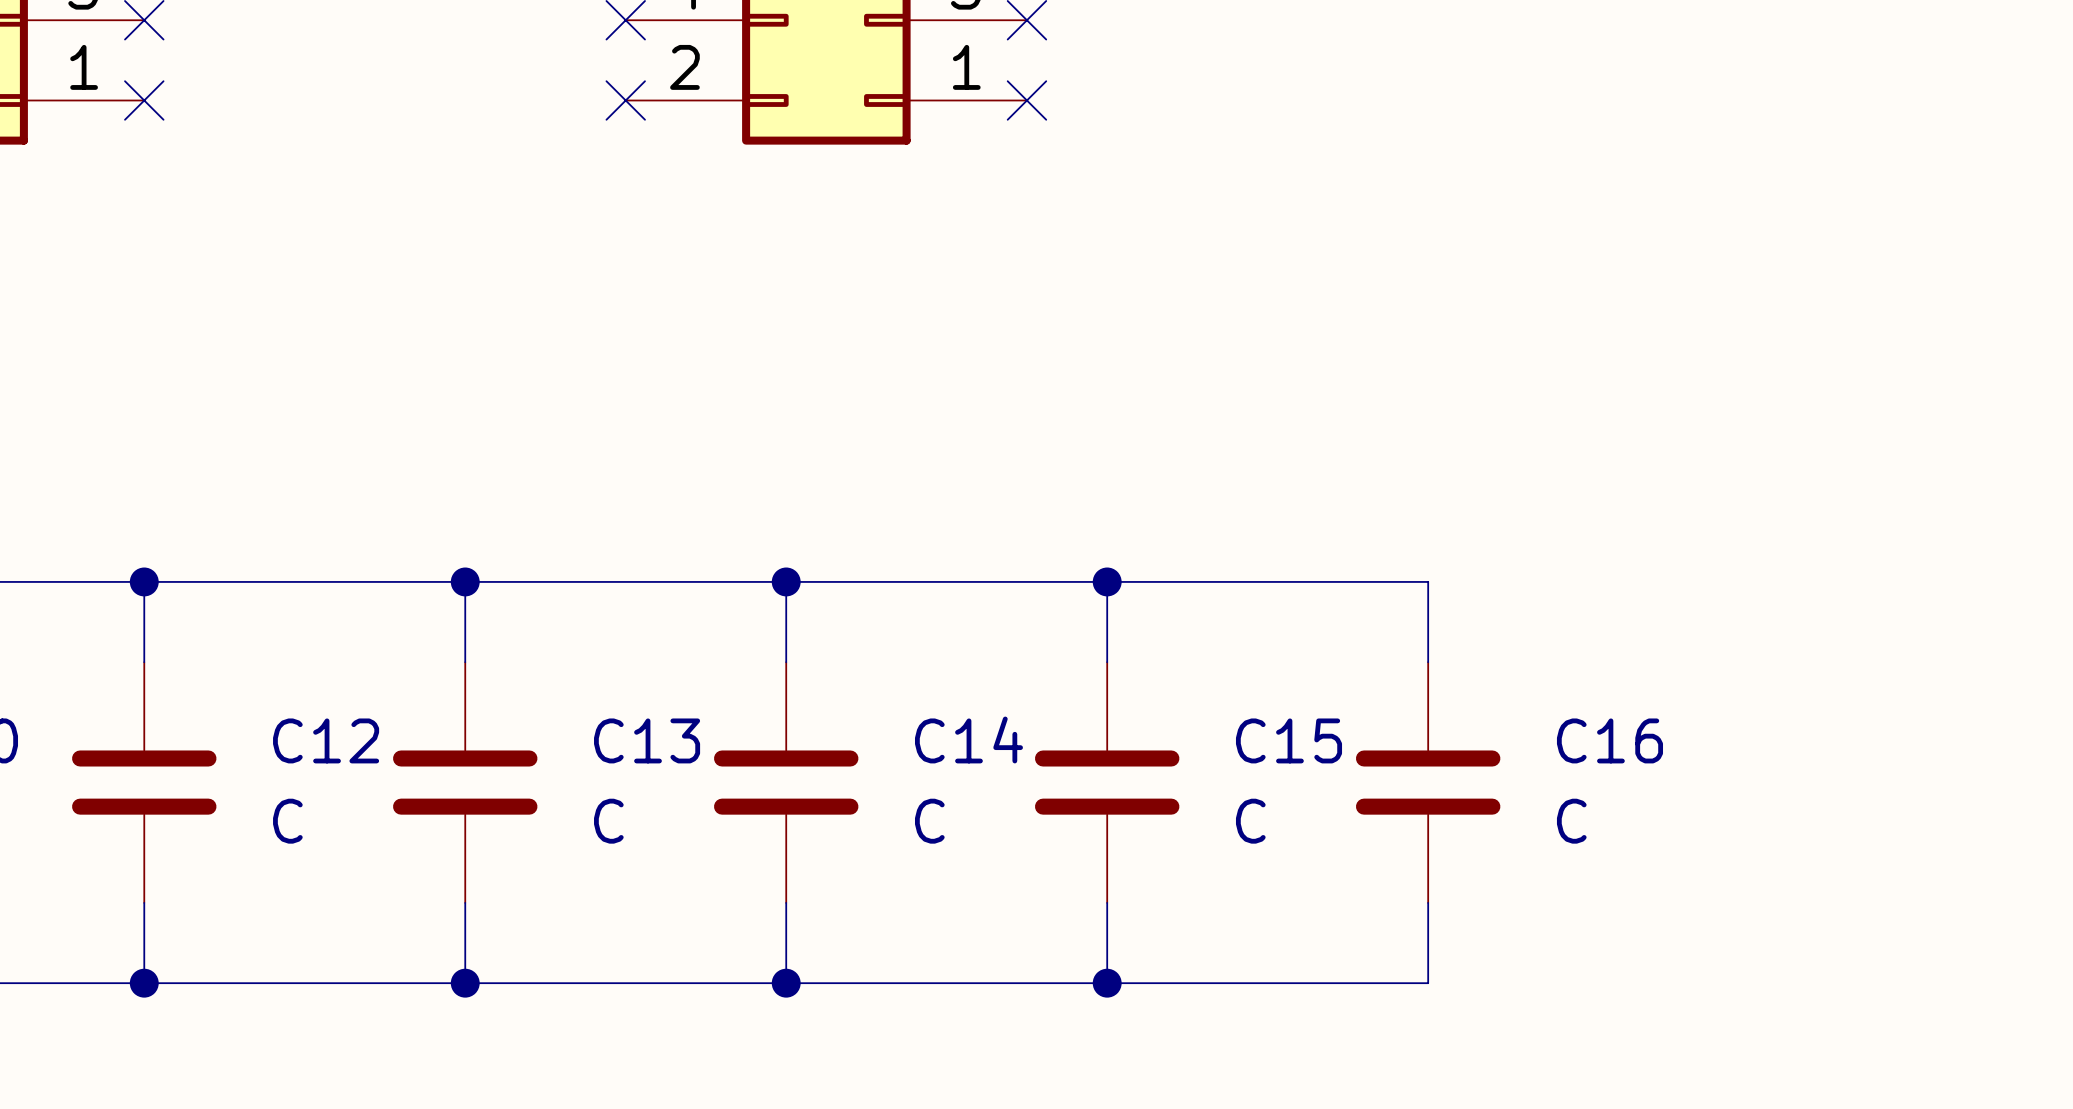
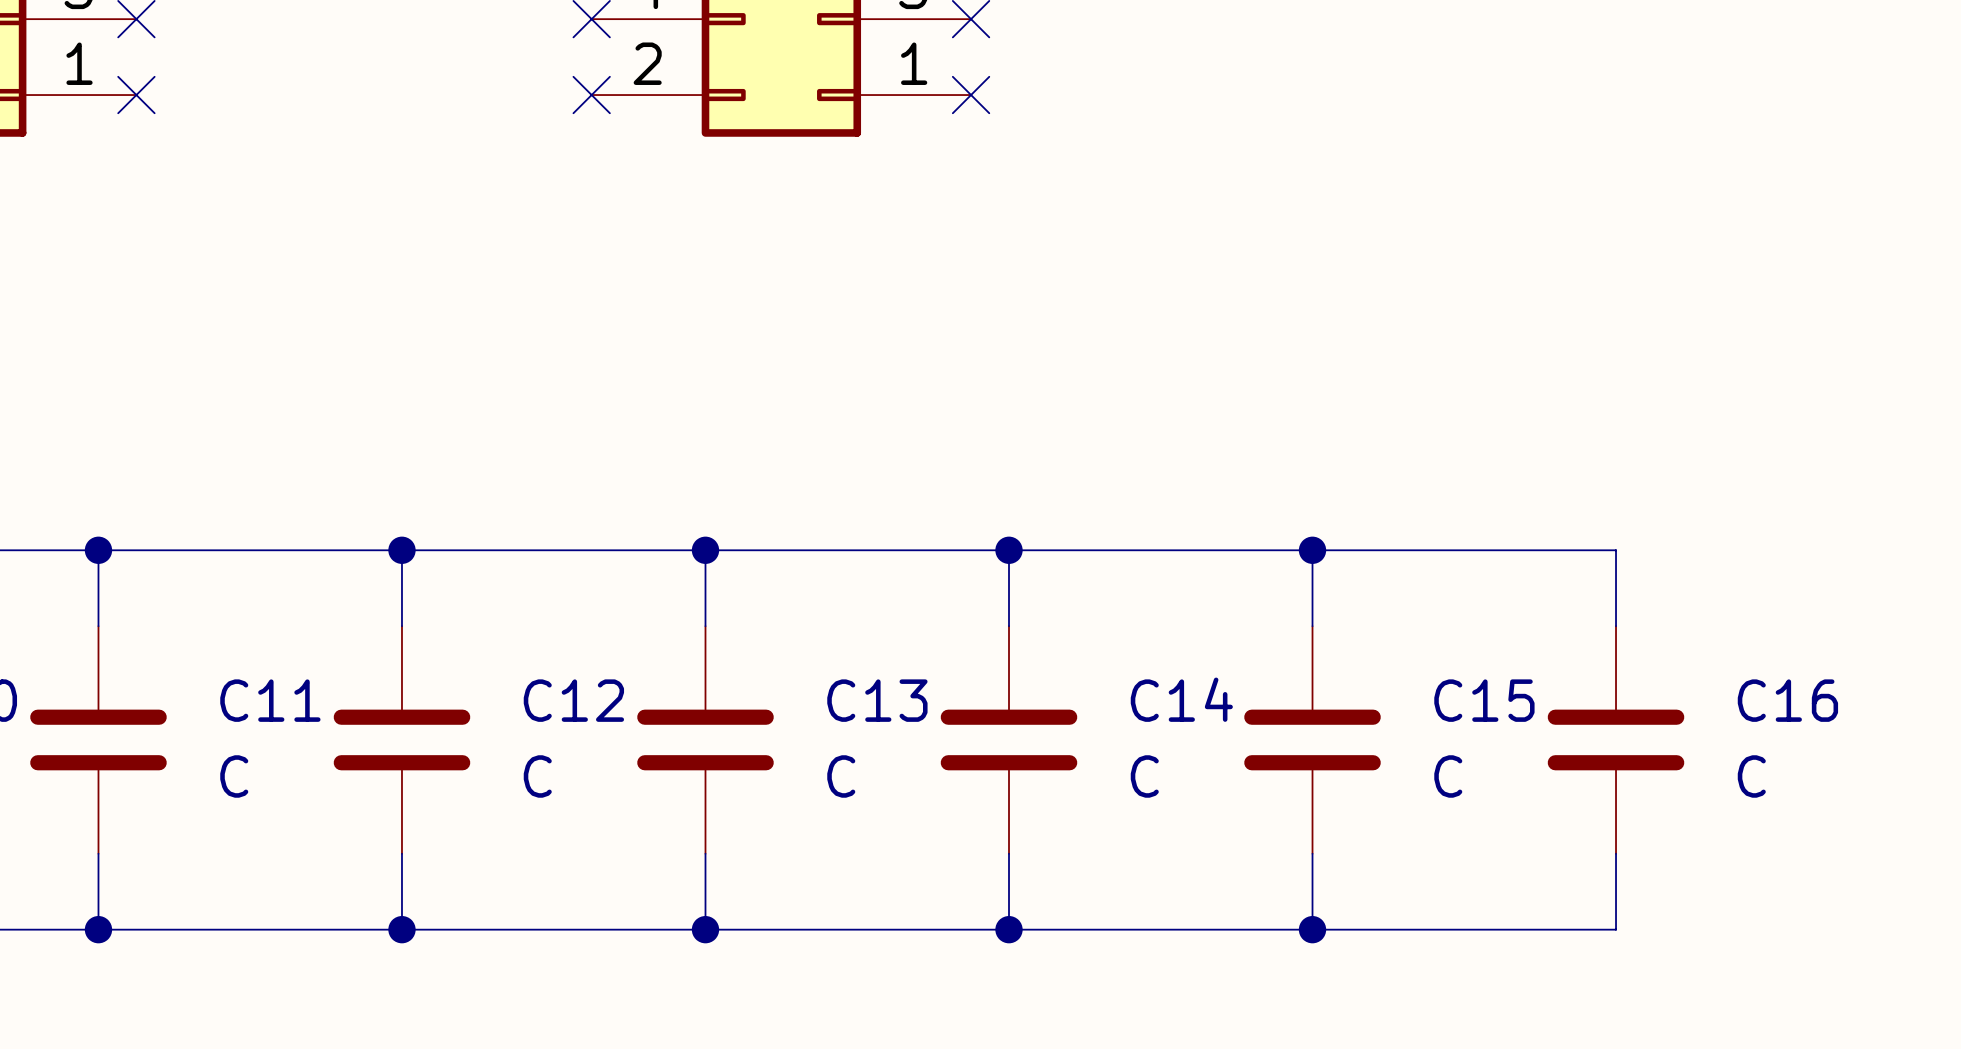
wire: (144, 581) (144, 662) -> (98, 550) (98, 626)
junction position: (144, 581) -> (98, 550)
wire: (465, 581) (465, 662) -> (401, 550) (401, 626)
junction position: (465, 581) -> (401, 550)
wire: (786, 581) (786, 662) -> (705, 550) (705, 626)
junction position: (786, 581) -> (705, 550)
wire: (1107, 581) (1107, 662) -> (1009, 550) (1009, 626)
junction position: (1107, 581) -> (1009, 550)
wire: none -> (1312, 550) (1312, 626)
junction: none -> (1312, 550)
wire: (1428, 581) (1428, 662) -> (1350, 550) (1616, 550) (1616, 626)
C11: none -> C (98, 739)
C12 position: (144, 782) -> (401, 739)
C13 position: (465, 782) -> (705, 739)
C14 position: (786, 782) -> (1009, 739)
C15 position: (1107, 782) -> (1312, 739)
C16 position: (1428, 782) -> (1616, 739)
wire: (144, 902) (144, 983) -> (98, 853) (98, 929)
wire: (465, 902) (465, 983) -> (401, 853) (401, 929)
wire: (786, 902) (786, 983) -> (705, 853) (705, 929)
wire: (1107, 902) (1107, 983) -> (1009, 853) (1009, 929)
wire: none -> (1312, 853) (1312, 929)
wire: (1428, 902) (1428, 983) -> (1616, 853) (1616, 929) (1350, 929)
junction position: (144, 983) -> (98, 929)
junction position: (465, 983) -> (401, 929)
junction position: (786, 983) -> (705, 929)
junction position: (1107, 983) -> (1009, 929)
junction: none -> (1312, 929)

